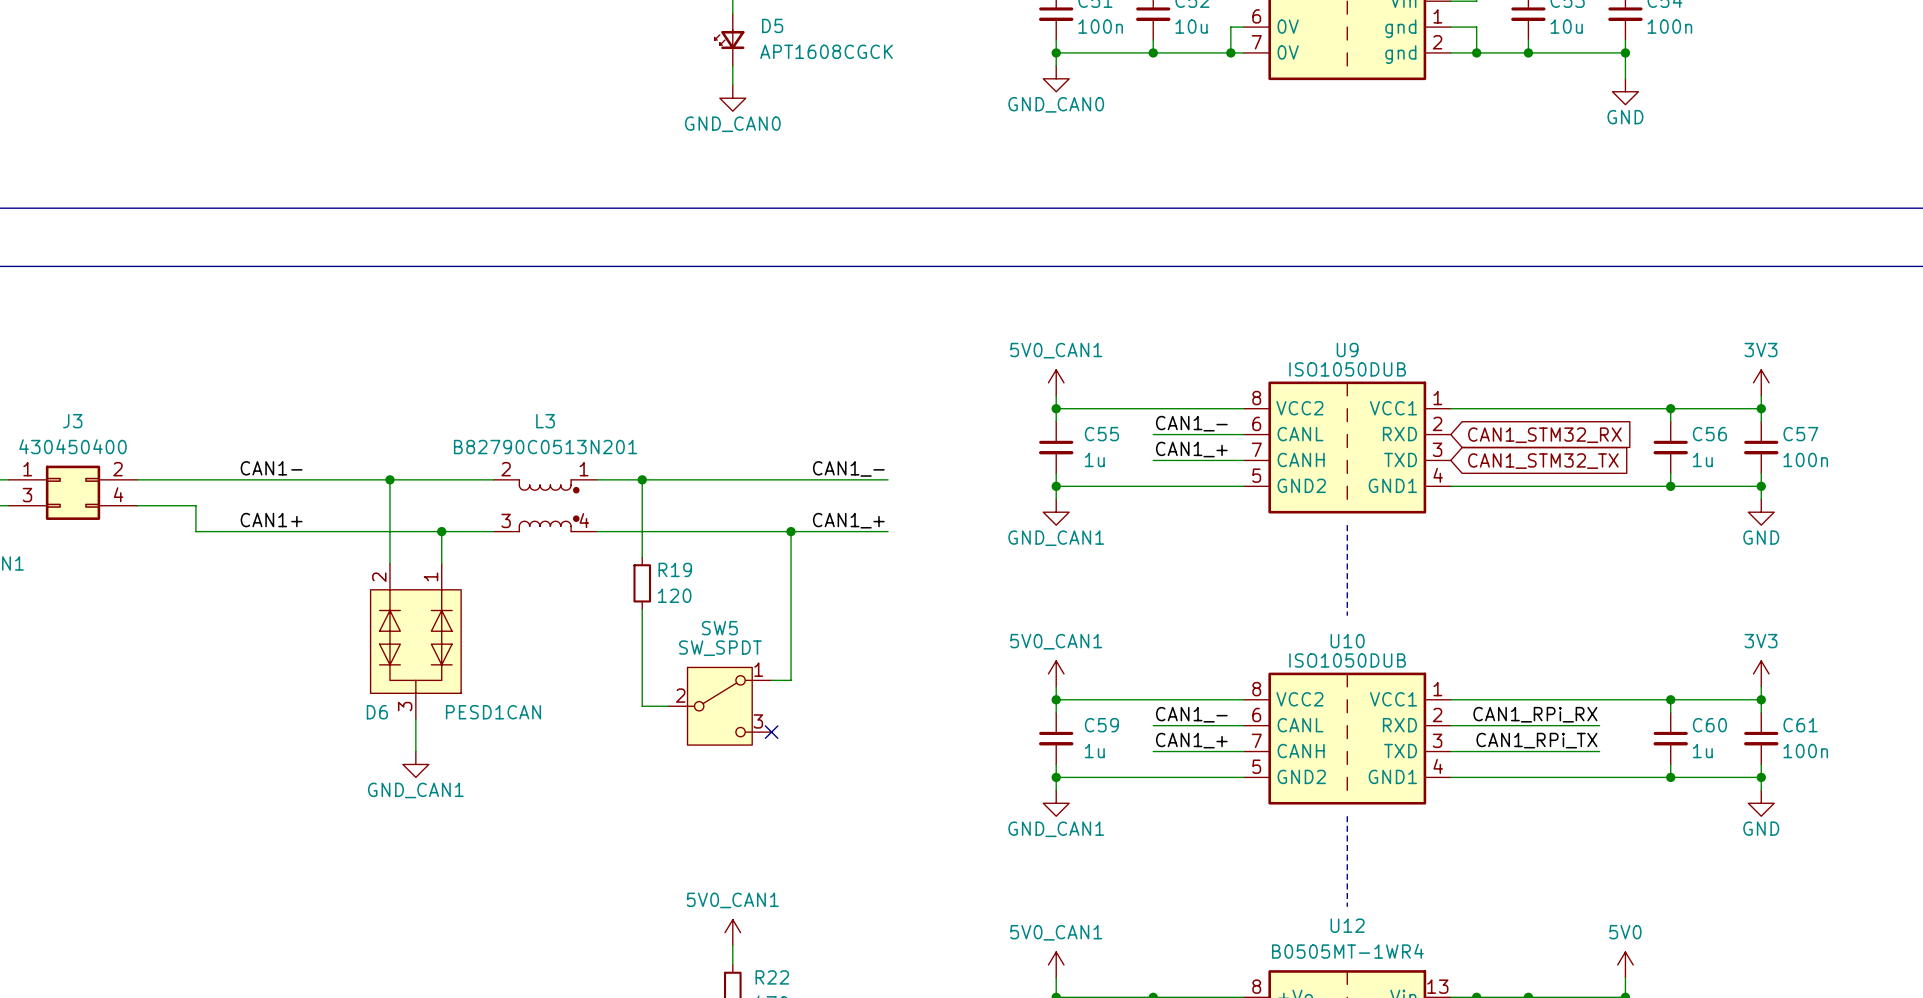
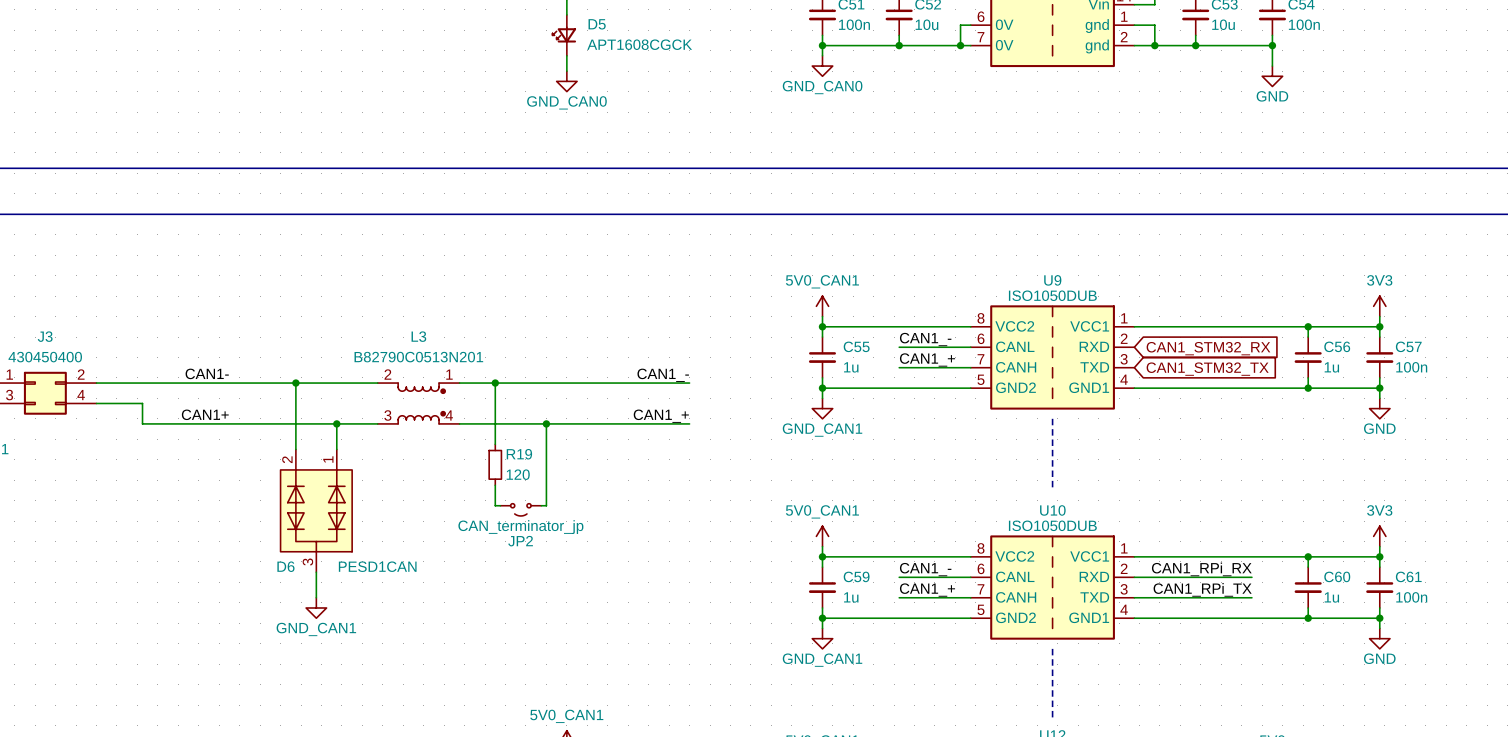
wire: none -> (546, 423) (546, 505) (541, 505)
junction: none -> (546, 423)
wire: (791, 531) (791, 680) (771, 680) -> none
junction: (791, 531) -> none
wire: (642, 635) (642, 706) (668, 706) -> (495, 505) (500, 505)
JP2: none -> CAN_terminator_jp (520, 509)
SW5: SW_SPDT (719, 706) -> none
no-connect mark: (771, 732) -> none

